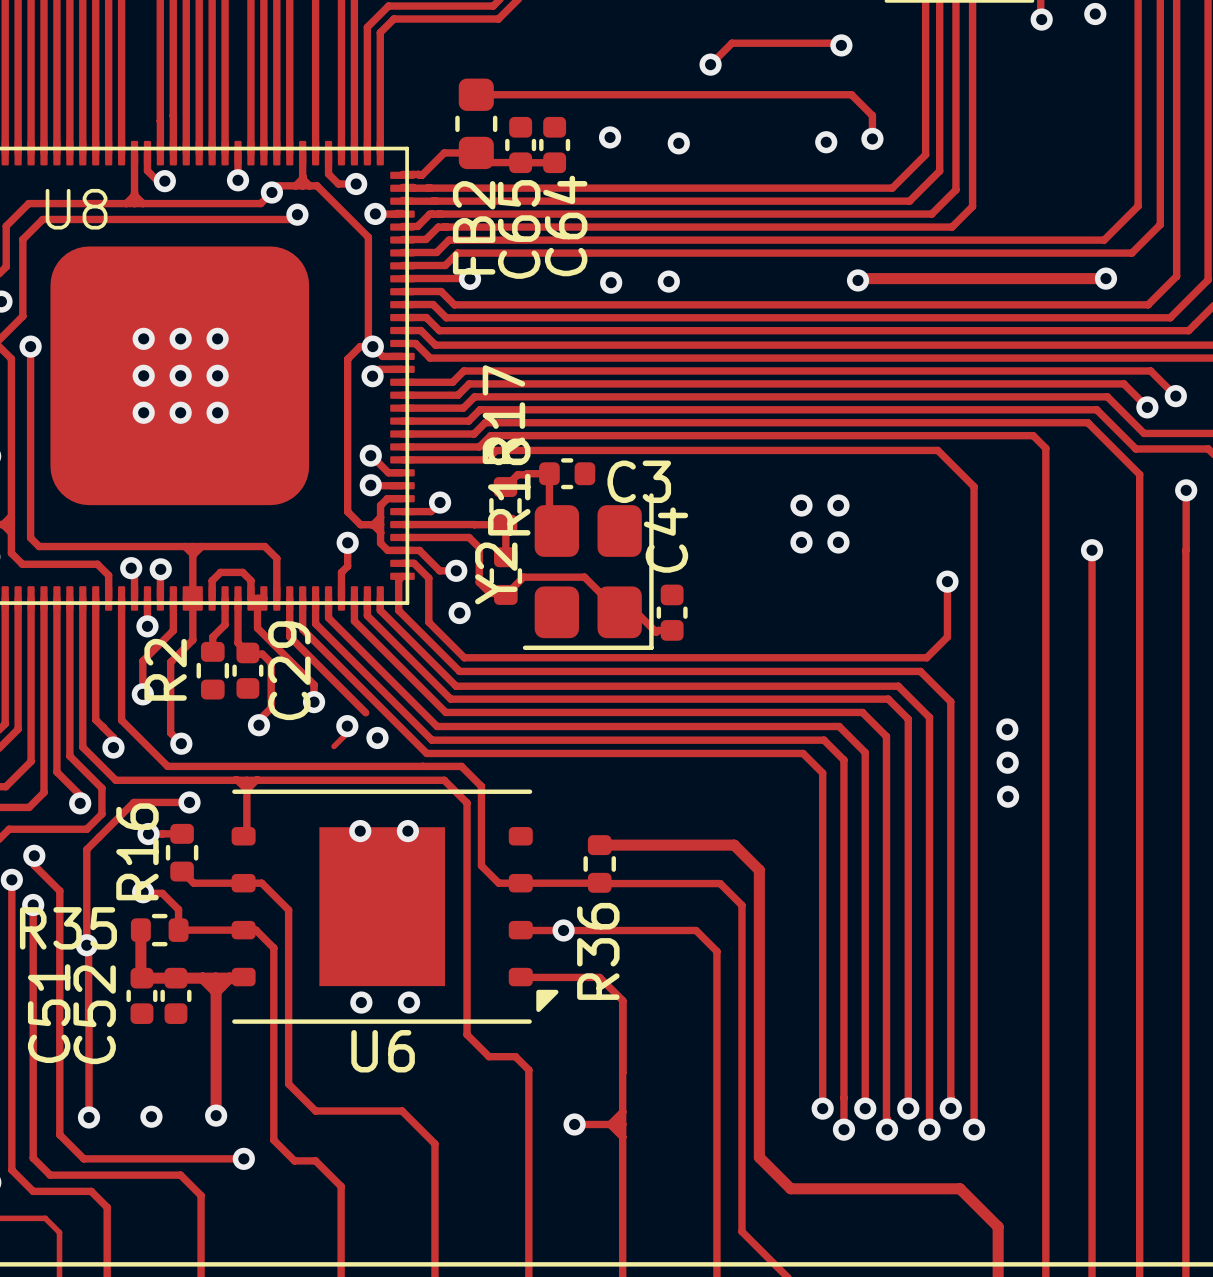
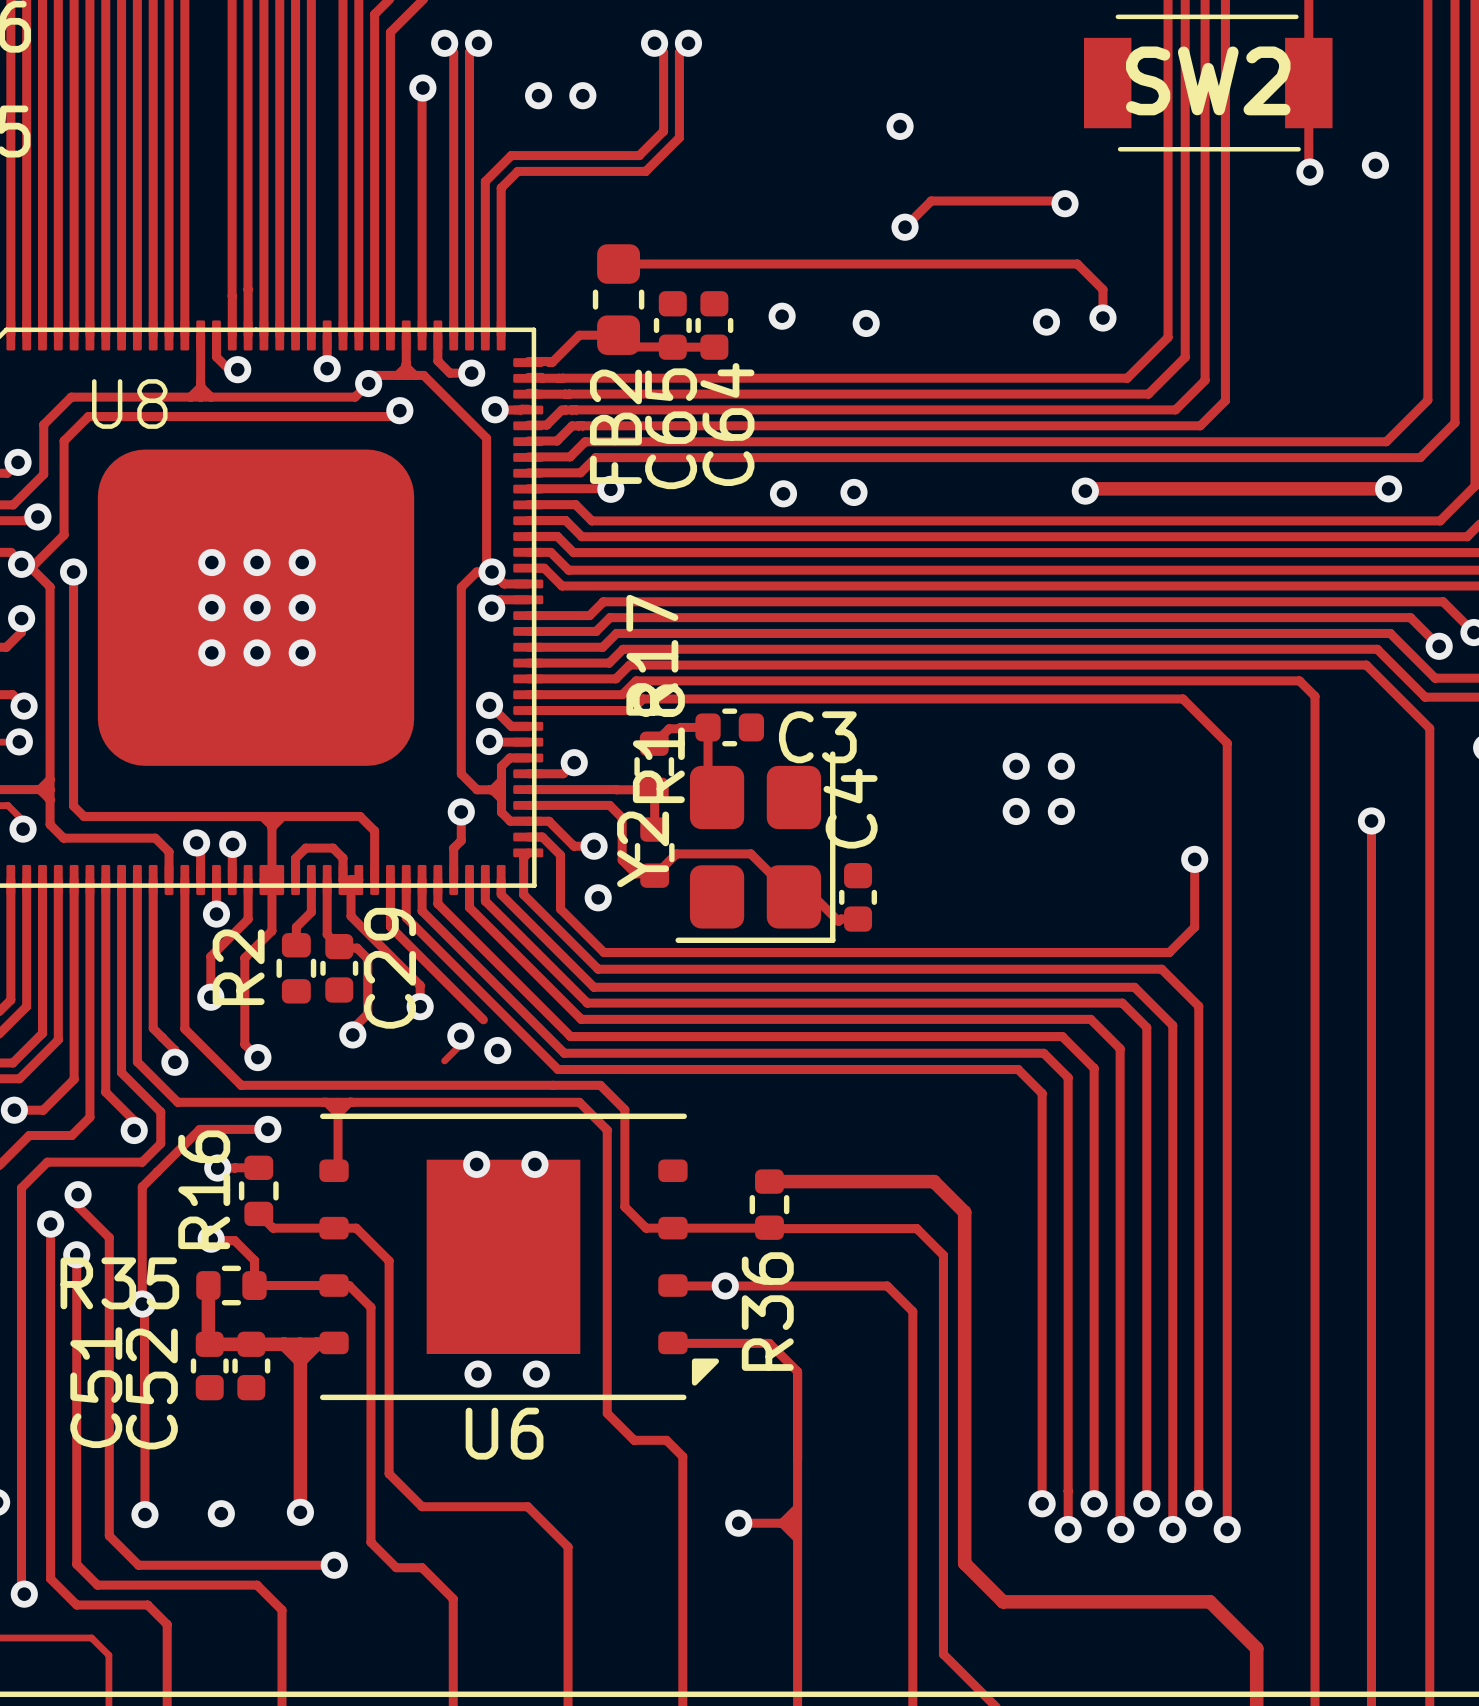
via: (1007, 729) -> none
via: (1007, 762) -> none
via: (1008, 796) -> none

